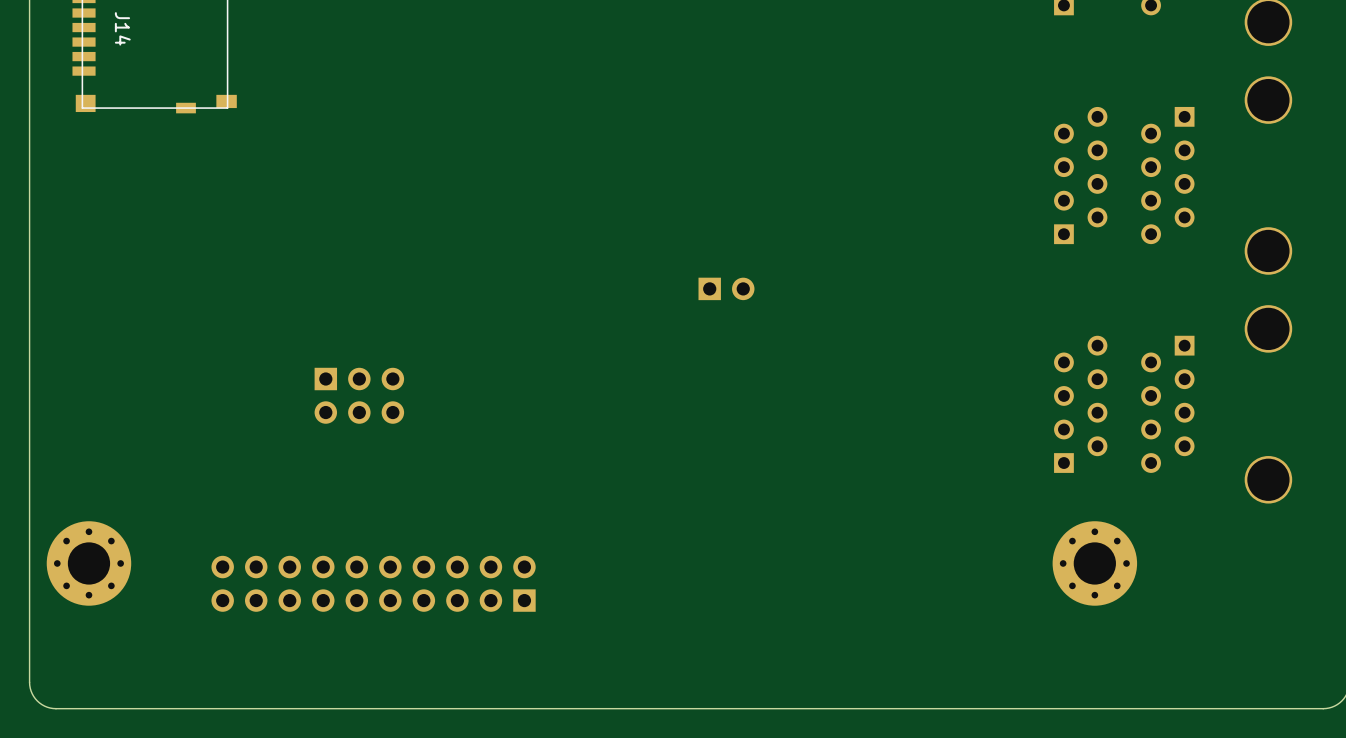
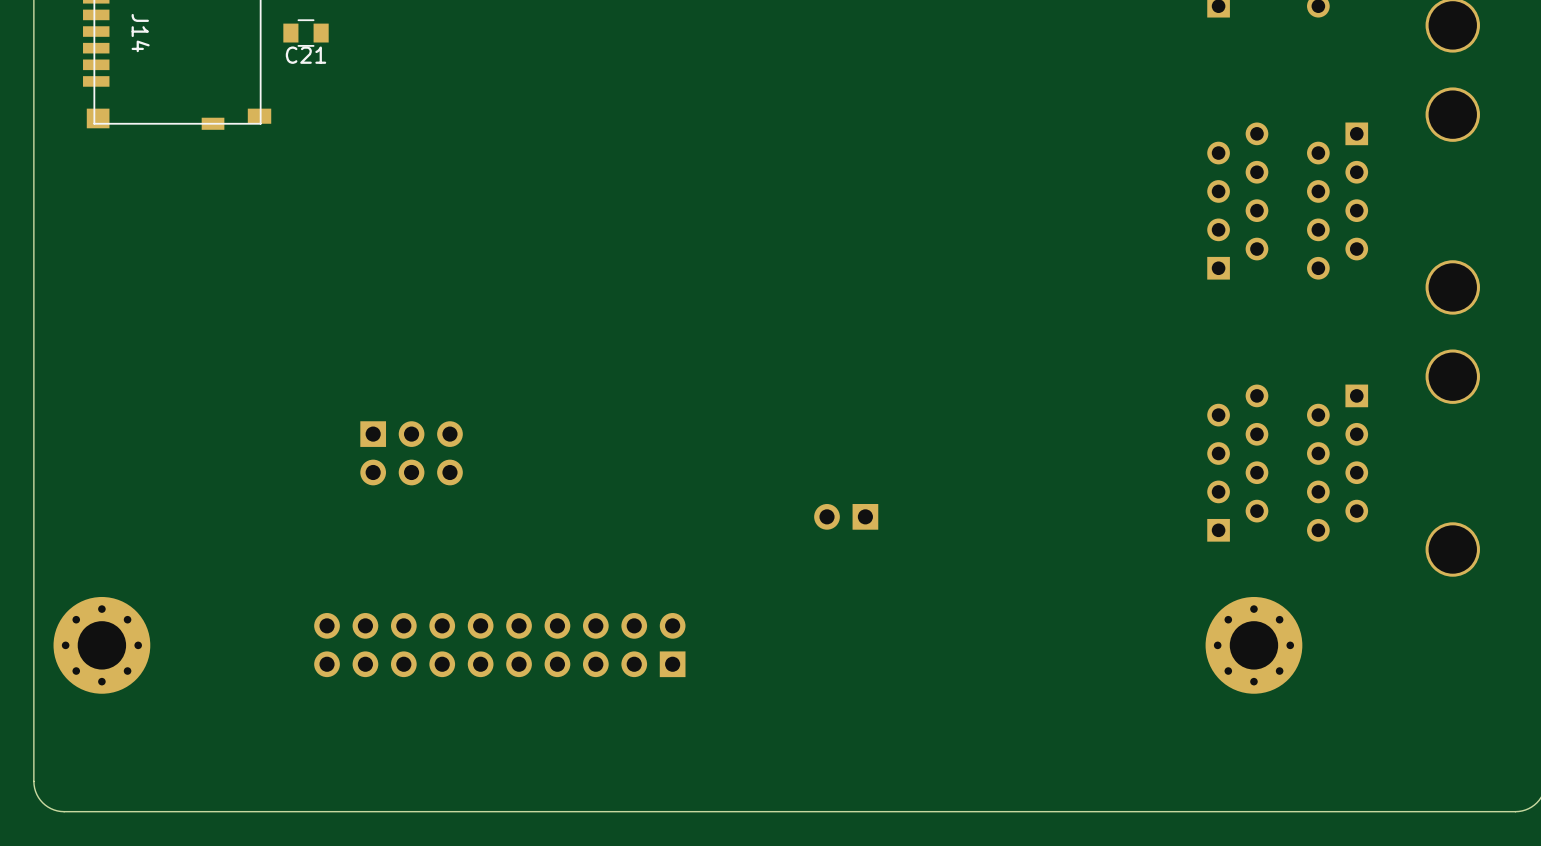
C21: none -> (306, 33)
part rotation: 0° (726, 288) -> 180° (846, 516)
part position: (726, 288) -> (846, 516)
part position: (373, 583) -> (499, 645)

